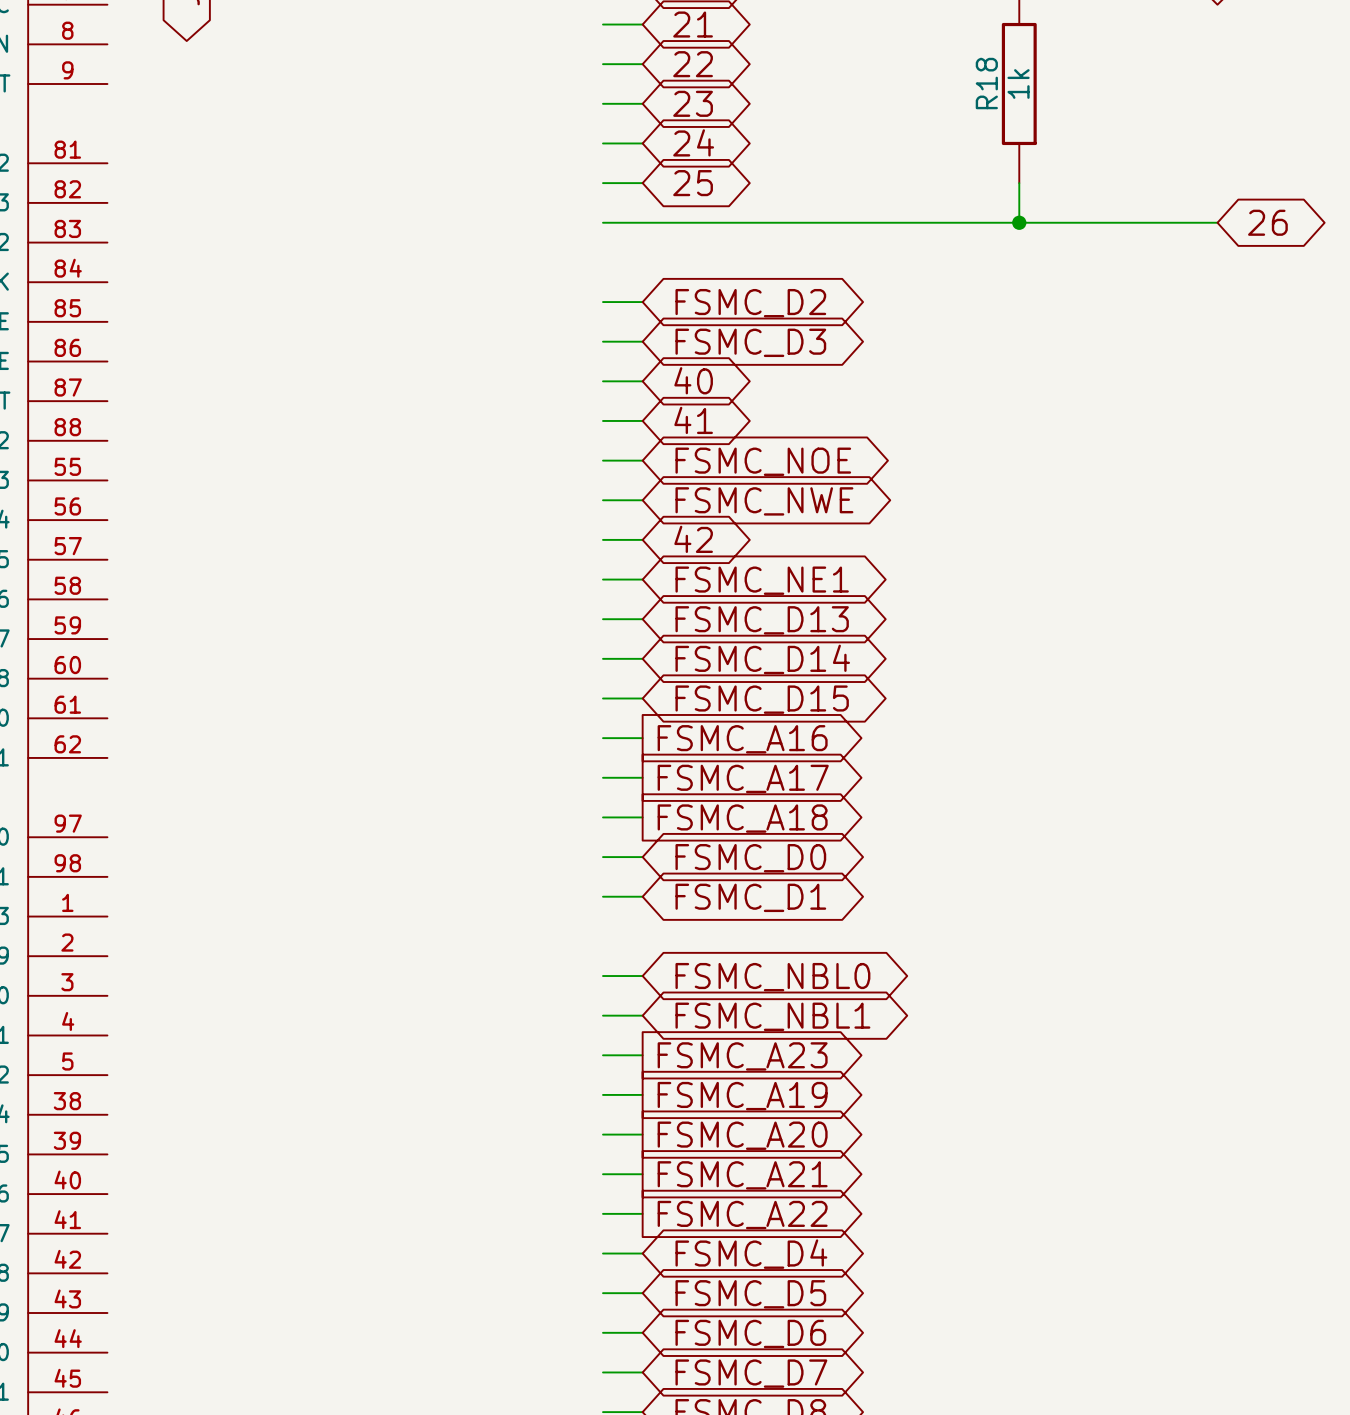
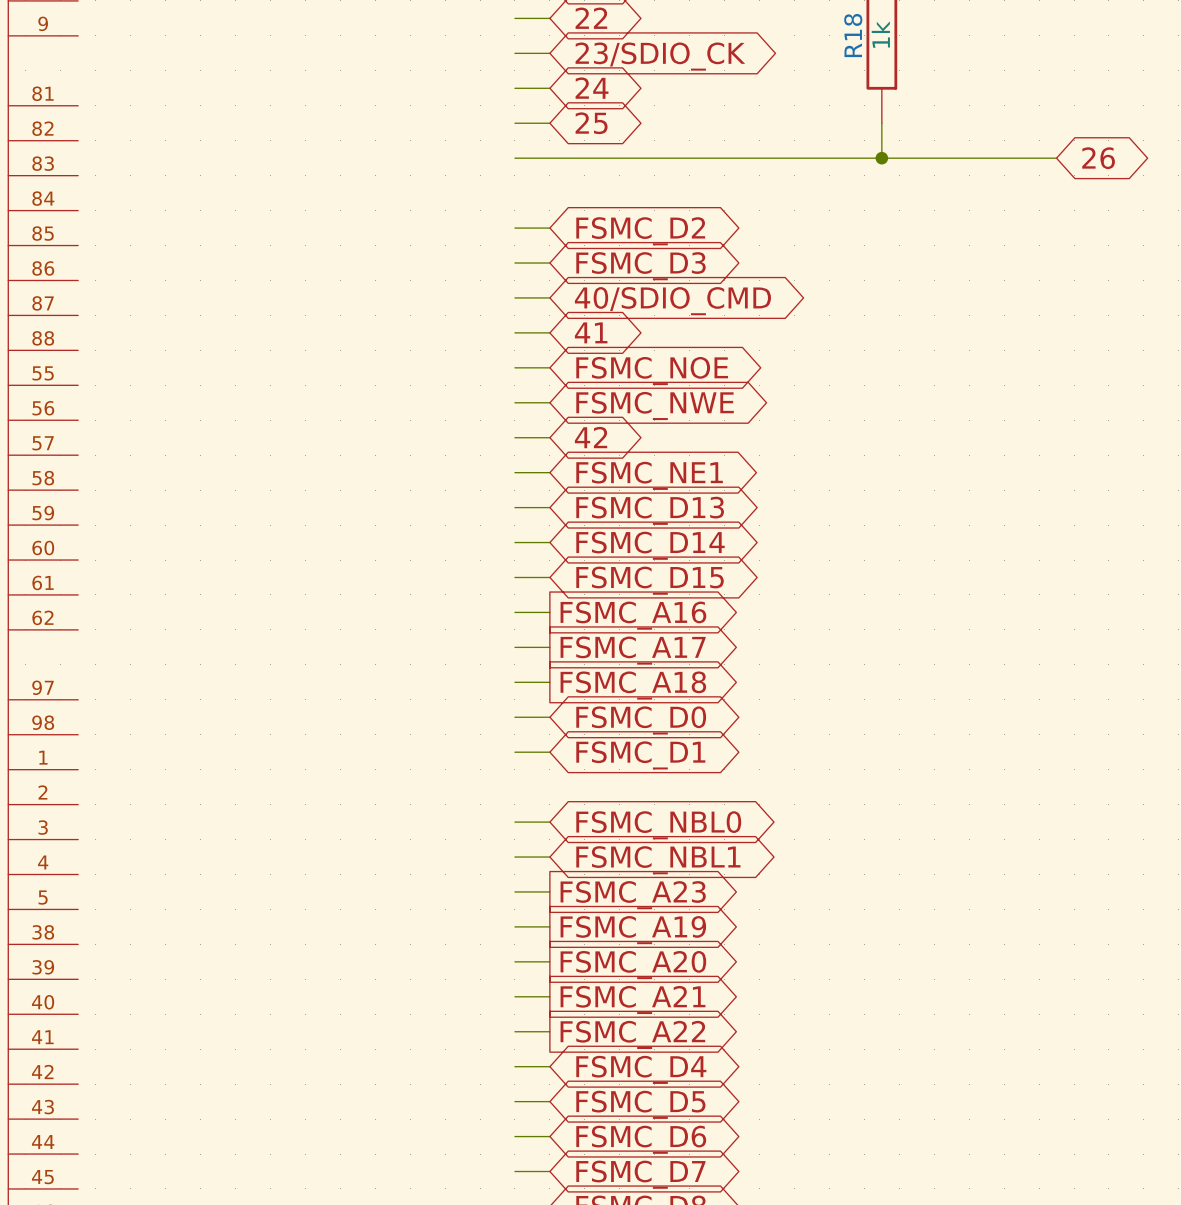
global label: 23 (693, 103) -> 23/SDIO_CK (660, 56)
global label: 40 (693, 380) -> 40/SDIO_CMD (672, 301)

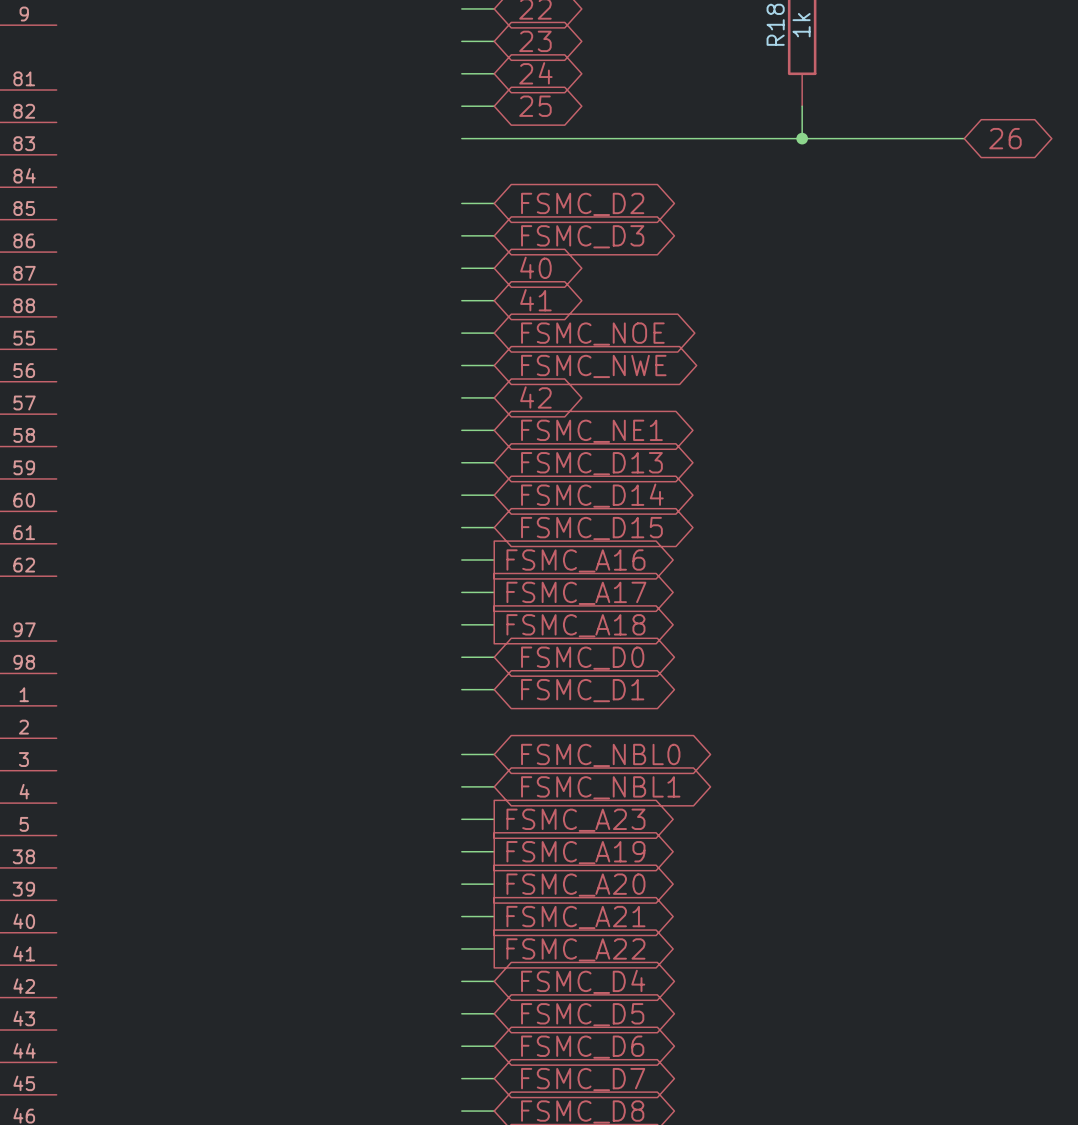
global label: 23/SDIO_CK (660, 56) -> 23 (535, 41)
global label: 40/SDIO_CMD (672, 301) -> 40 (535, 267)

